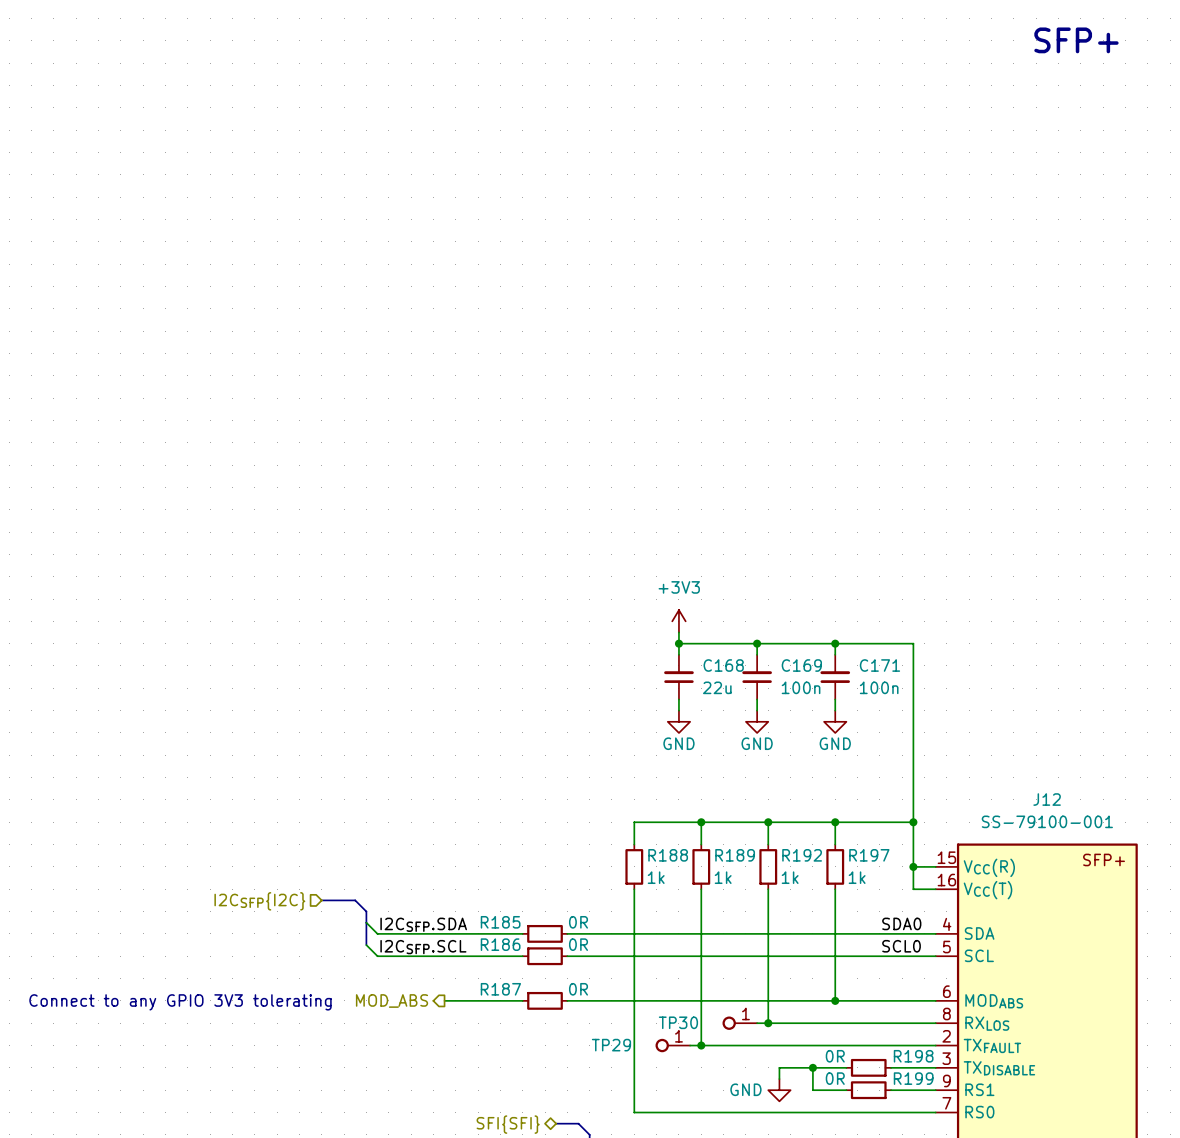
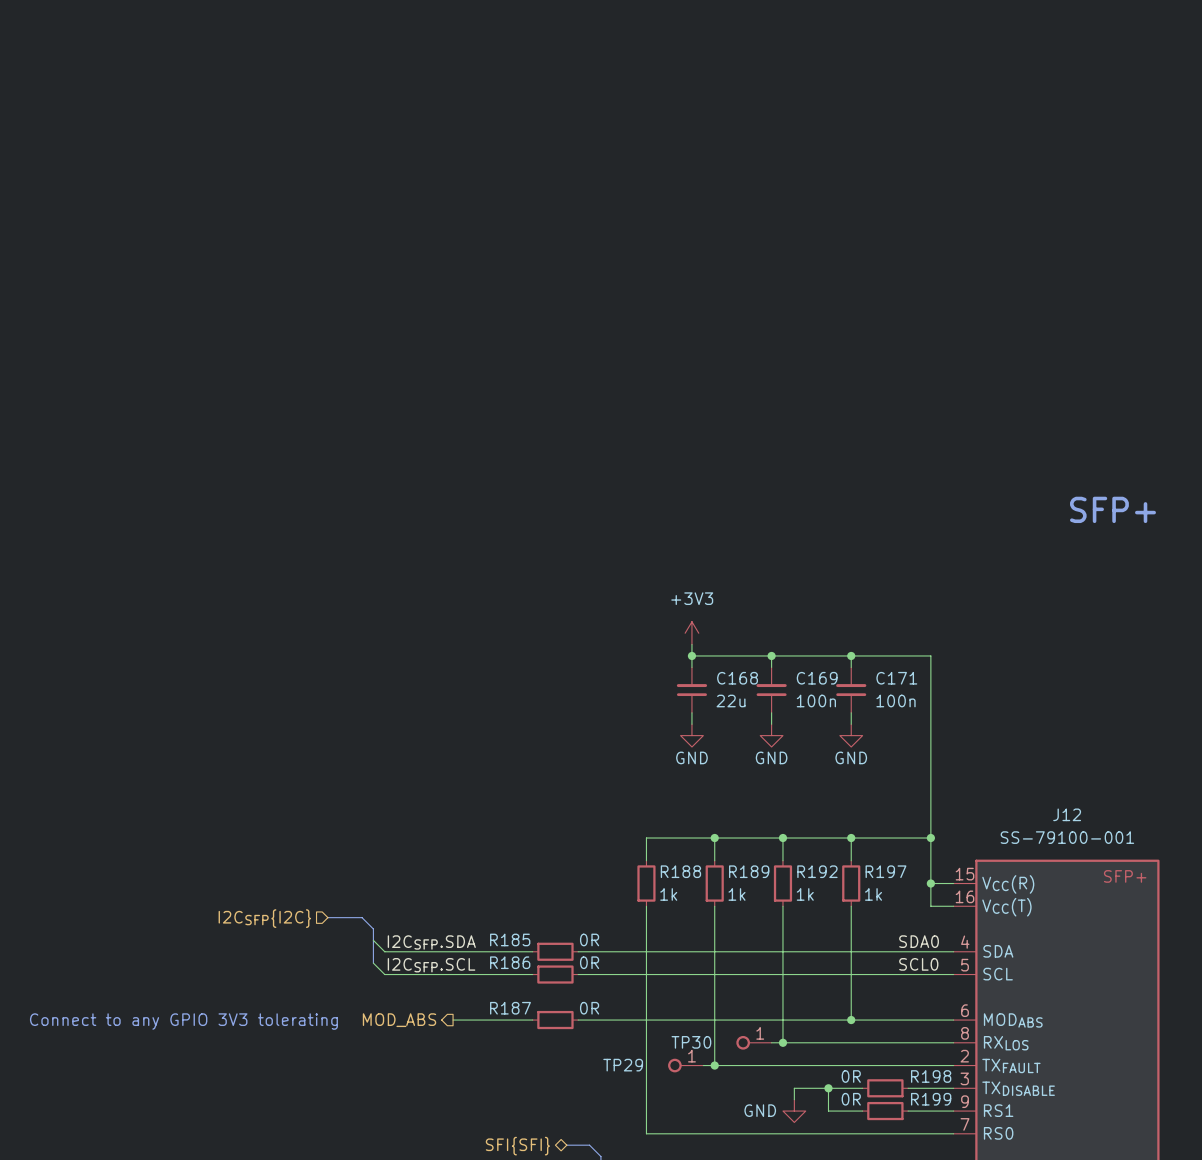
text: SFP+ (1076, 40) -> none
text: none -> SFP+ (1112, 509)

